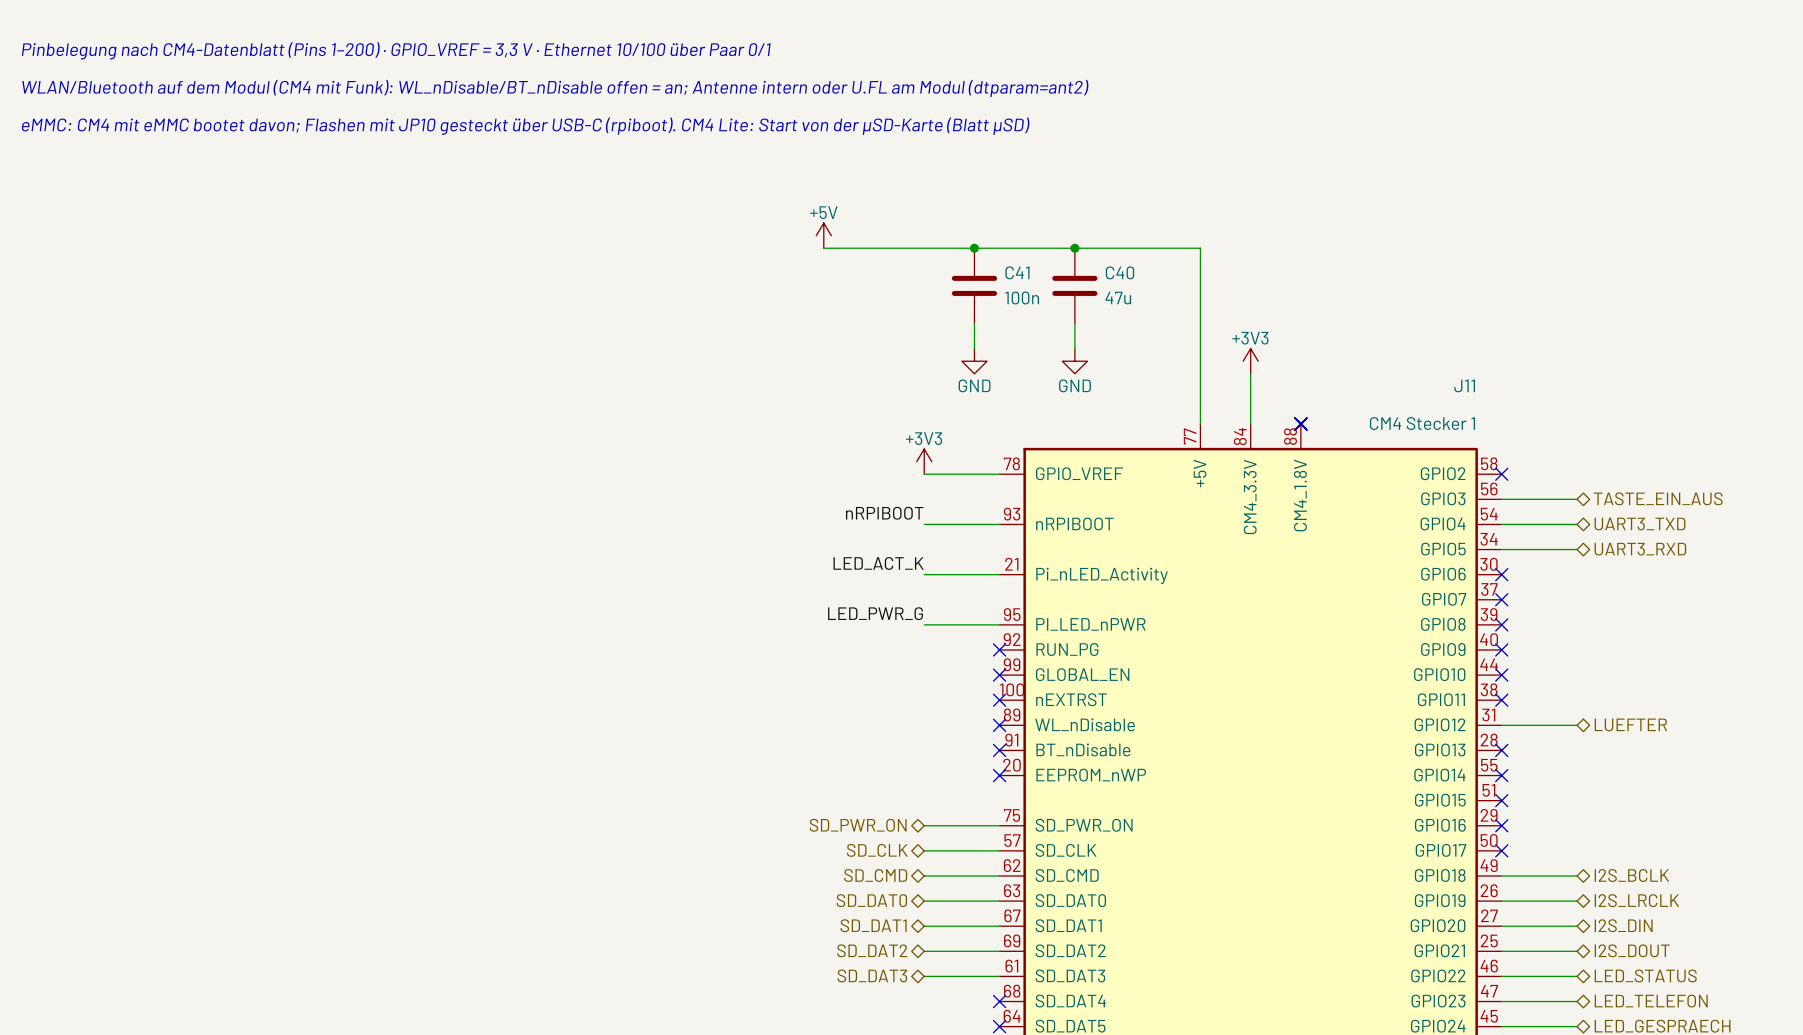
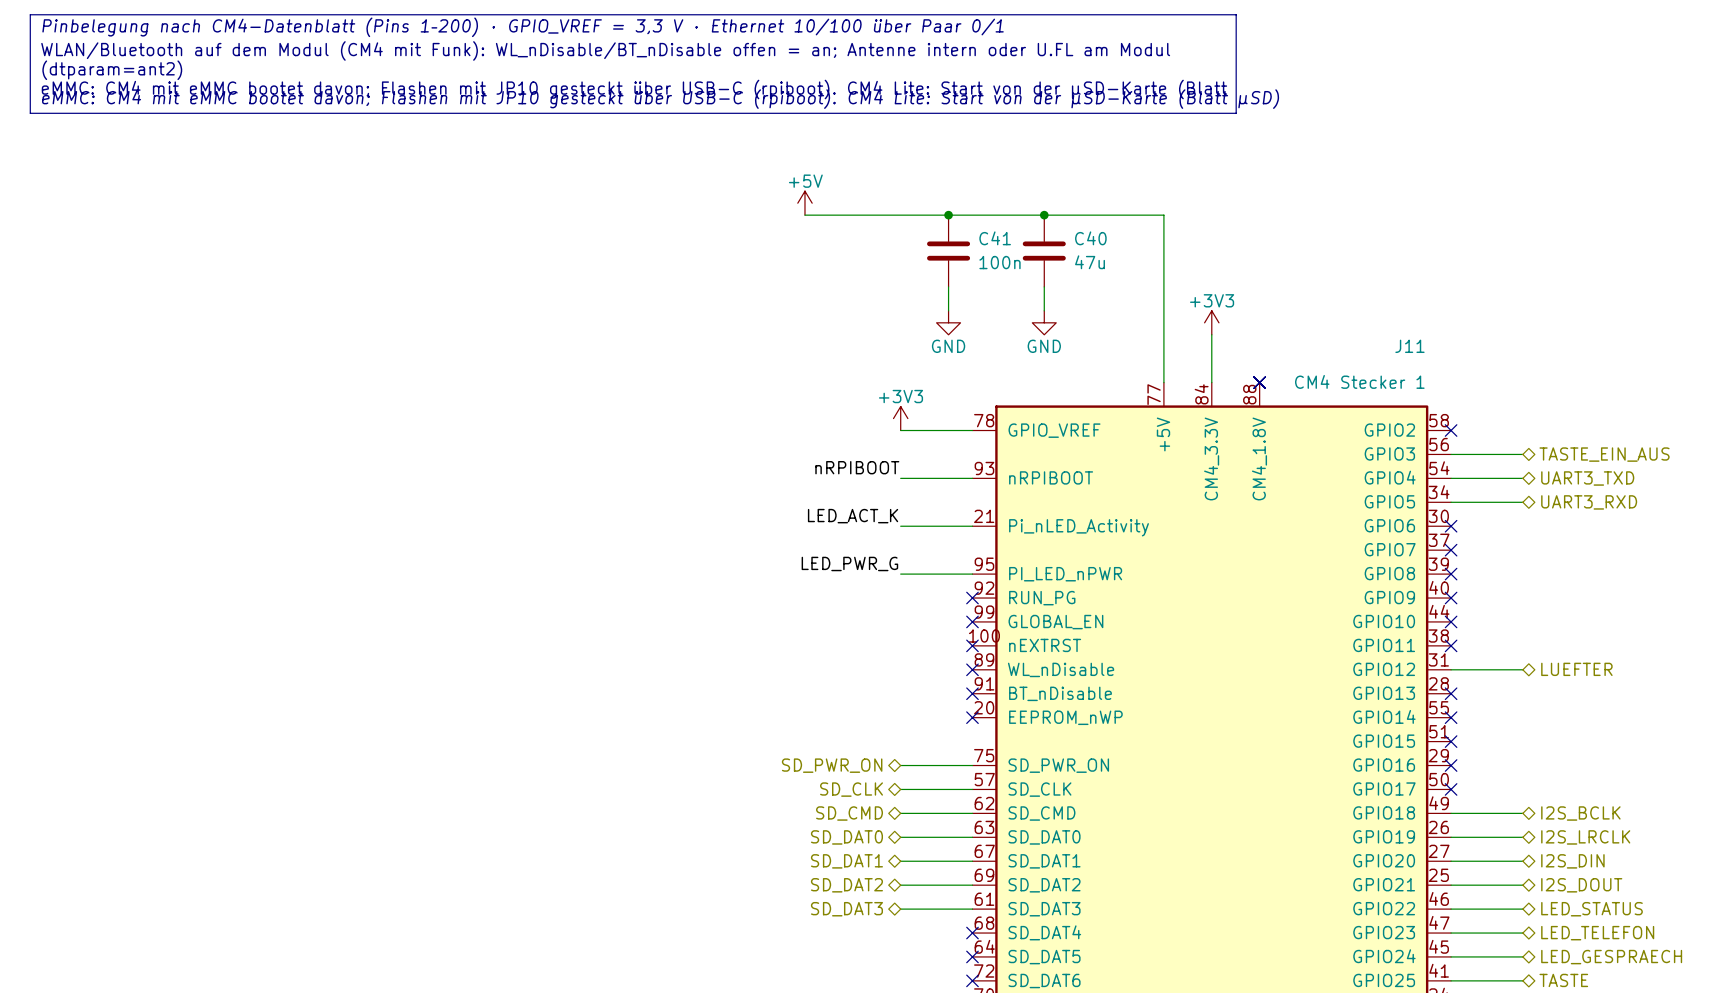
line: none -> (30, 14) (1236, 14) (1236, 113) (30, 113) (30, 14)
text: WLAN/Bluetooth auf dem Modul (CM4 mit Funk): WL_nDisable/BT_nDisable offen = an; Antenne intern oder U.FL am Modul (dtparam=ant2) (555, 88) -> WLAN/Bluetooth auf dem Modul (CM4 mit Funk): WL_nDisable/BT_nDisable offen = an; Antenne intern oder U.FL am Modul (605, 50)
text: none -> (dtparam=ant2) (112, 70)
text: none -> eMMC: CM4 mit eMMC bootet davon; Flashen mit JP10 gesteckt über USB-C (rpiboot). CM4 Lite: Start von der µSD-Karte (Blatt (634, 89)

